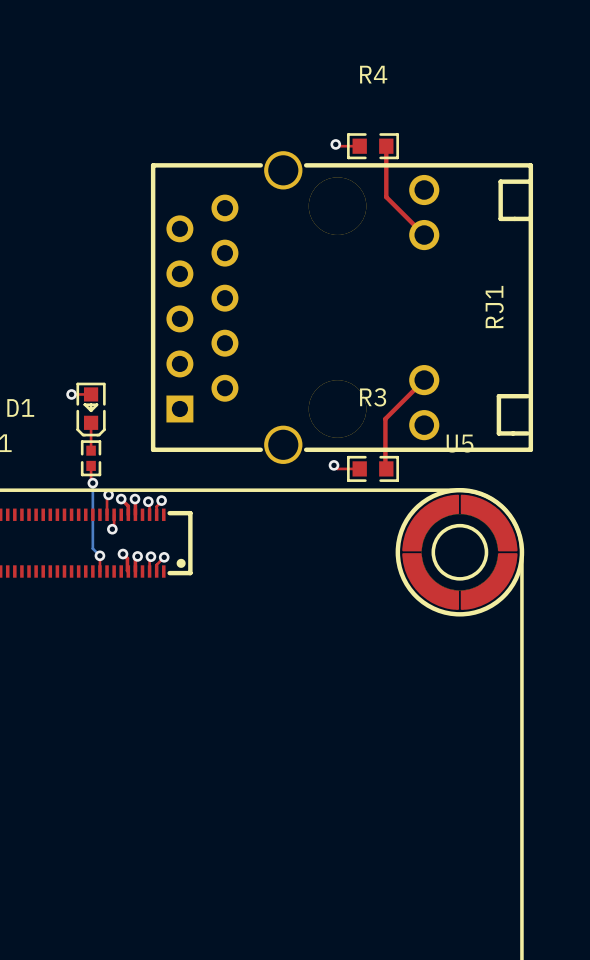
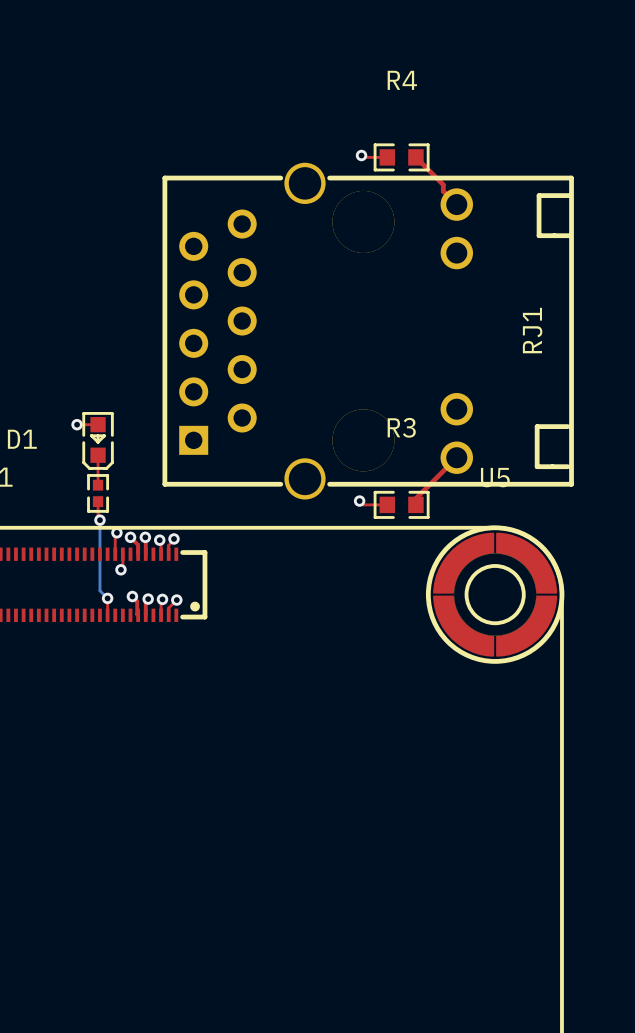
top track: (386, 146) (386, 197) (424, 235) -> (415, 157) (443, 184) (443, 191) (456, 204)
top track: (424, 380) (385, 418) (386, 468) -> (456, 457) (415, 498) (415, 504)

